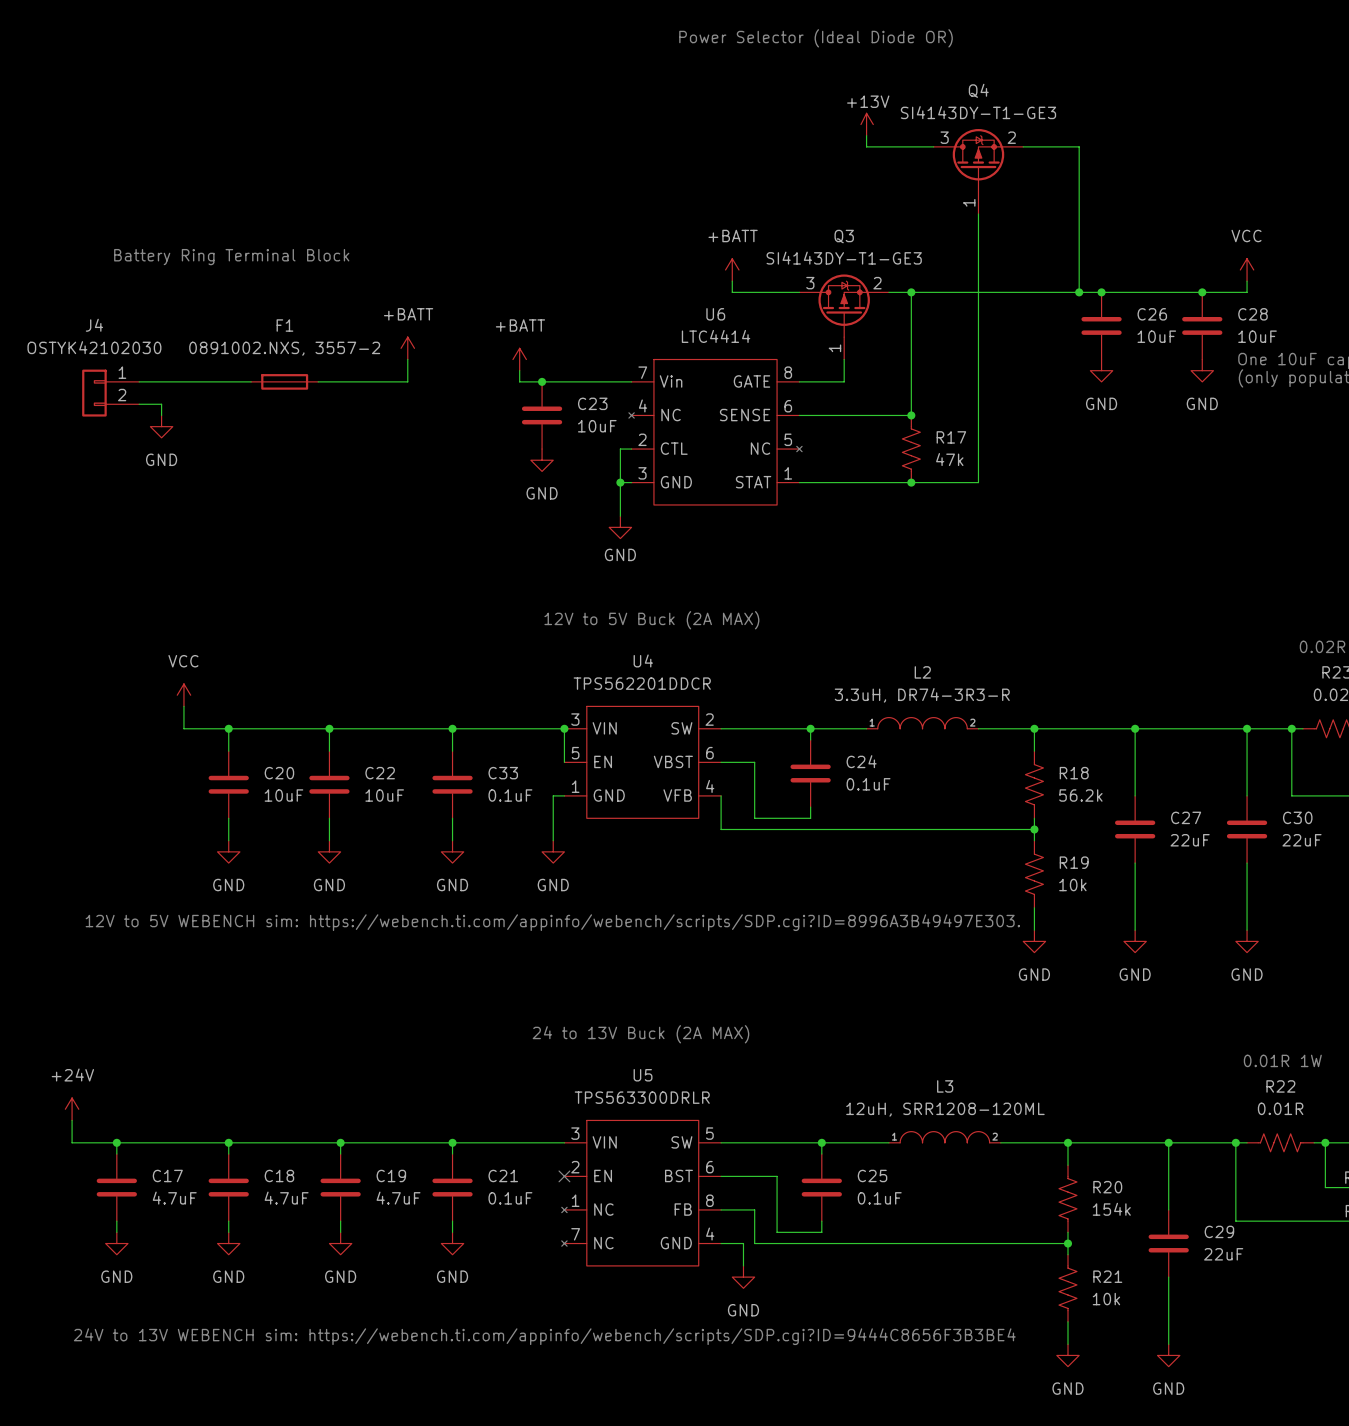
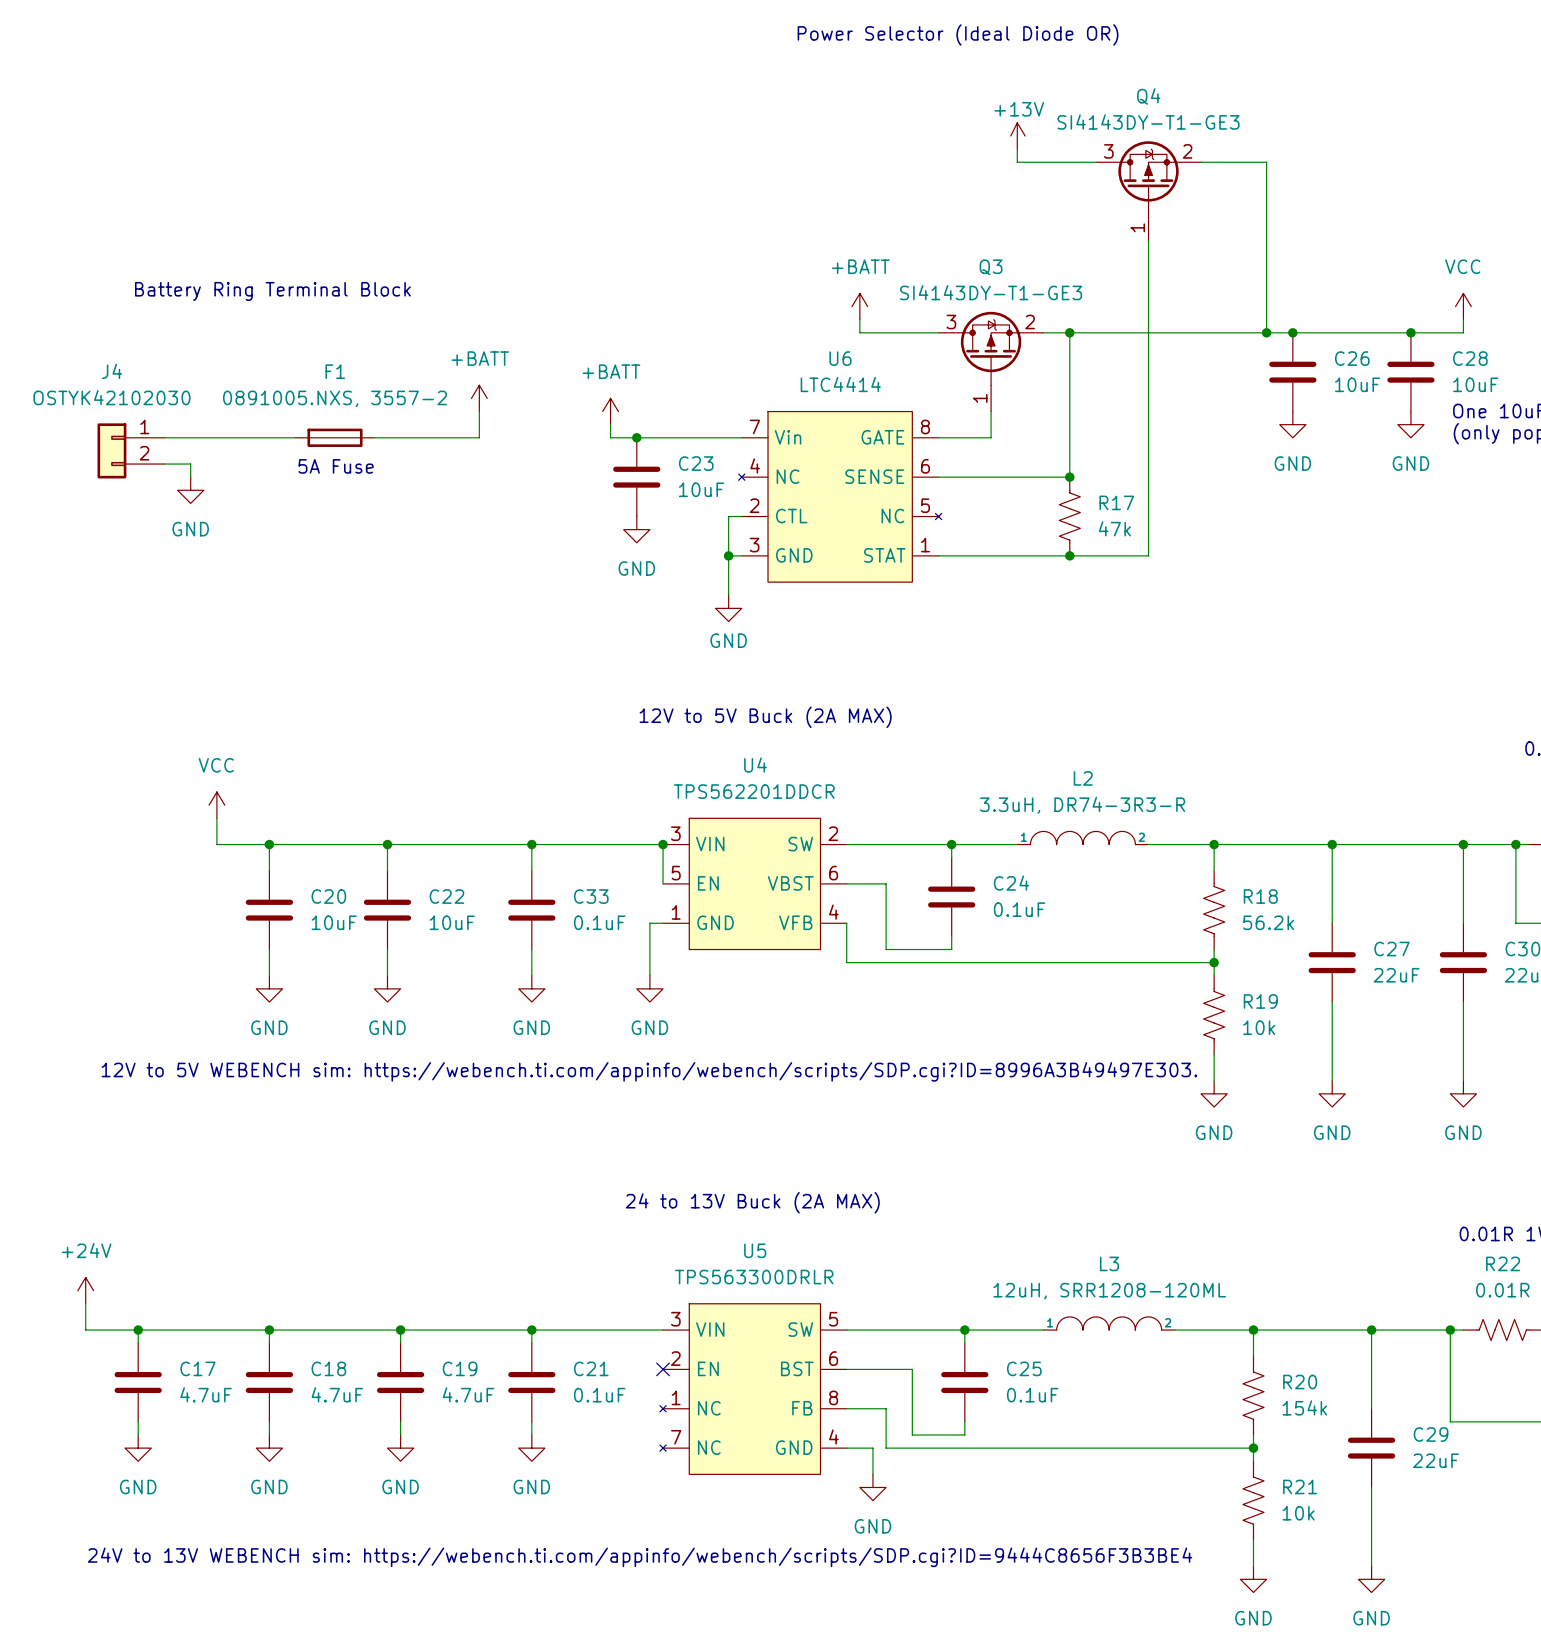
F1 value: 0891002.NXS, 3557-2 (284, 348) -> 0891005.NXS, 3557-2 (335, 398)
text: none -> 5A Fuse (336, 466)

